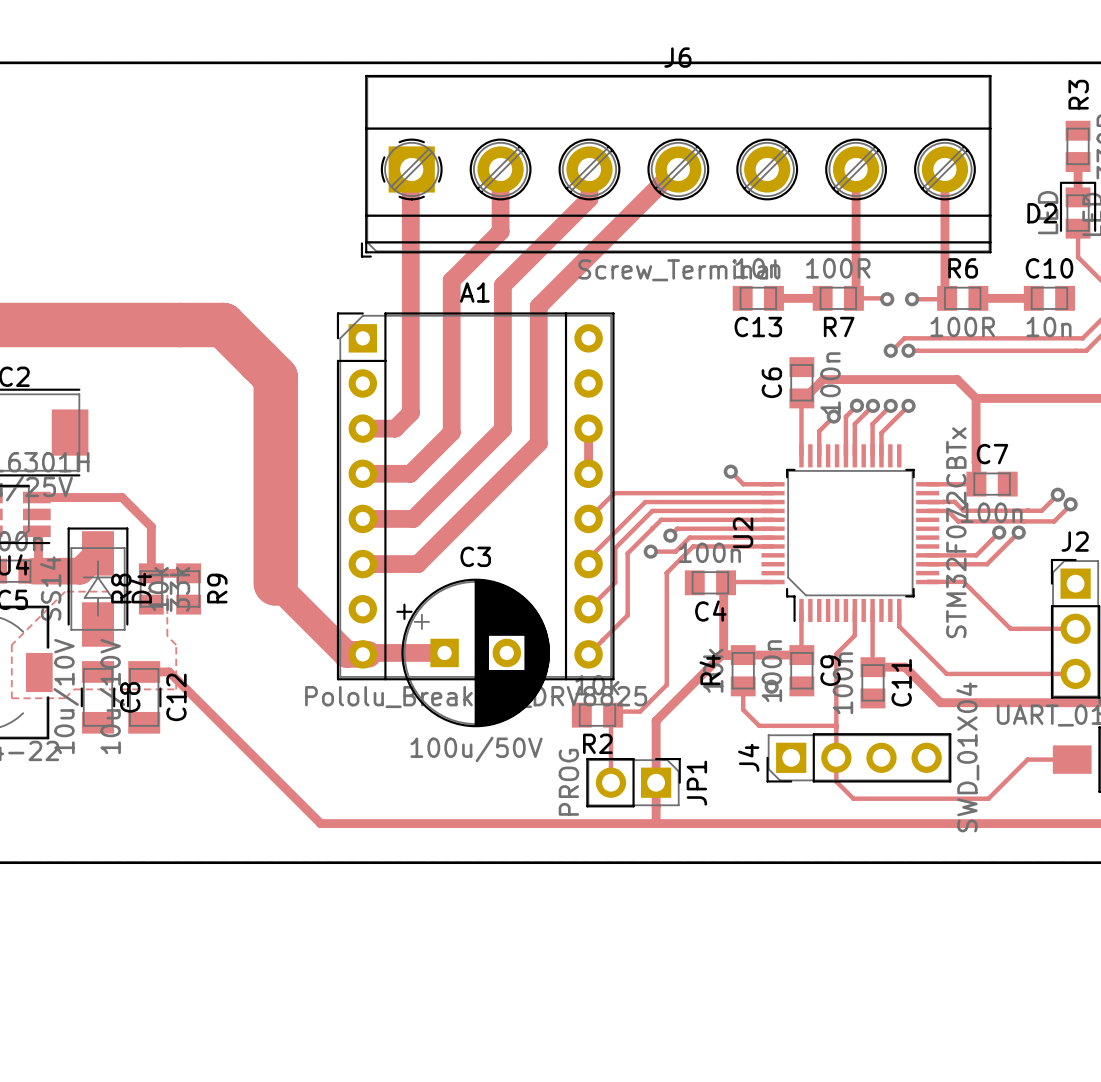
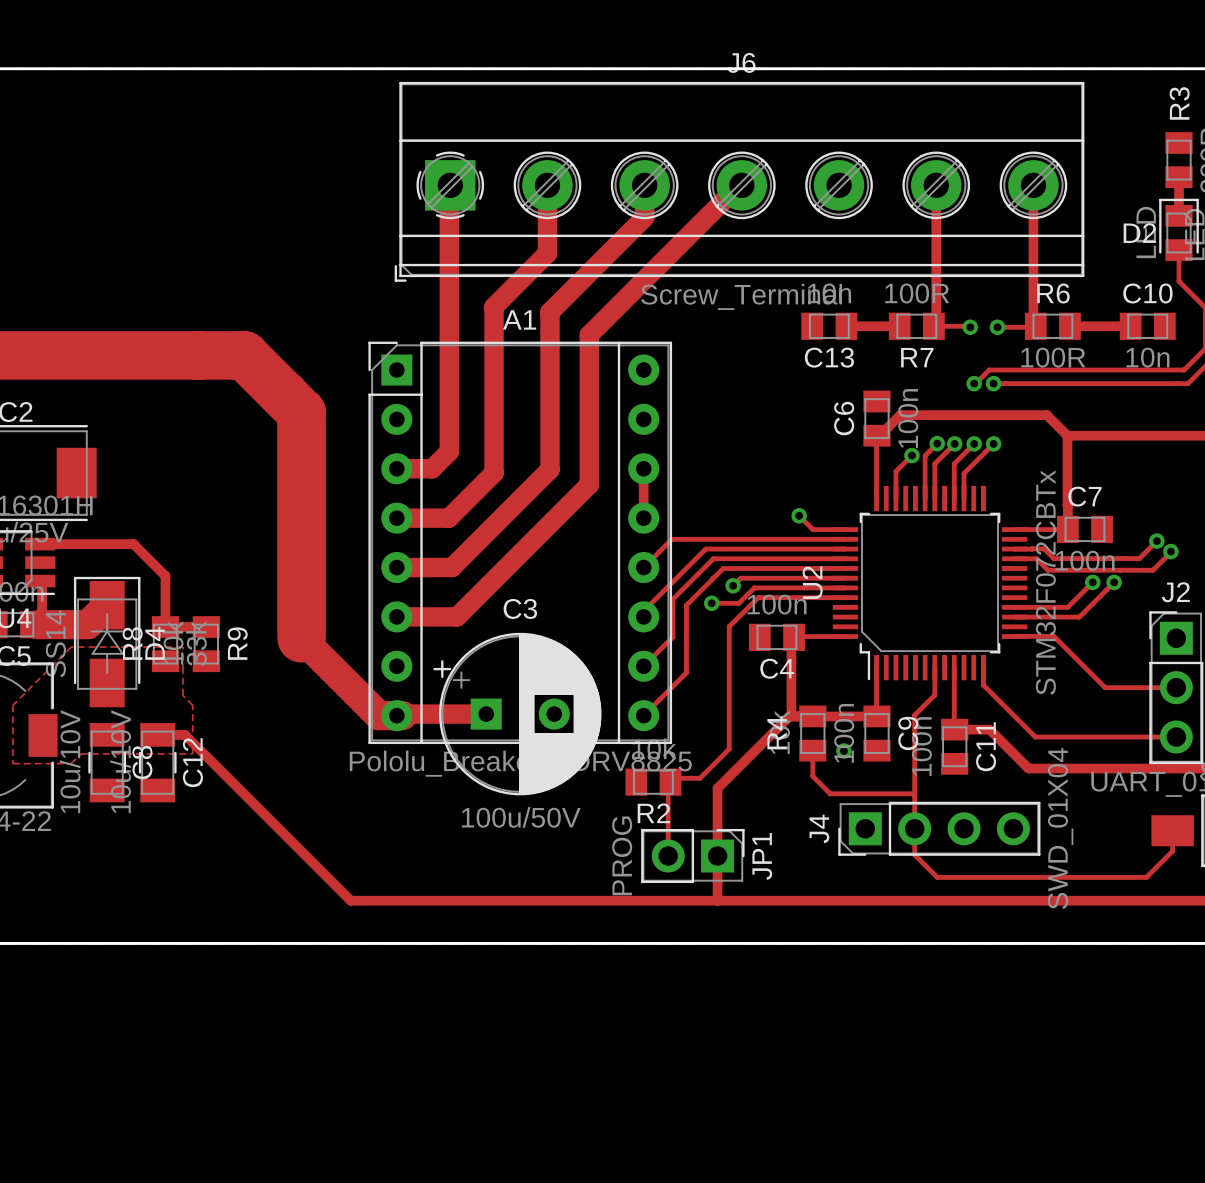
track: (1072, 759) (1027, 759) (988, 798) (853, 798) -> (1172, 830) (1172, 851) (1146, 877) (937, 877) (933, 873)

